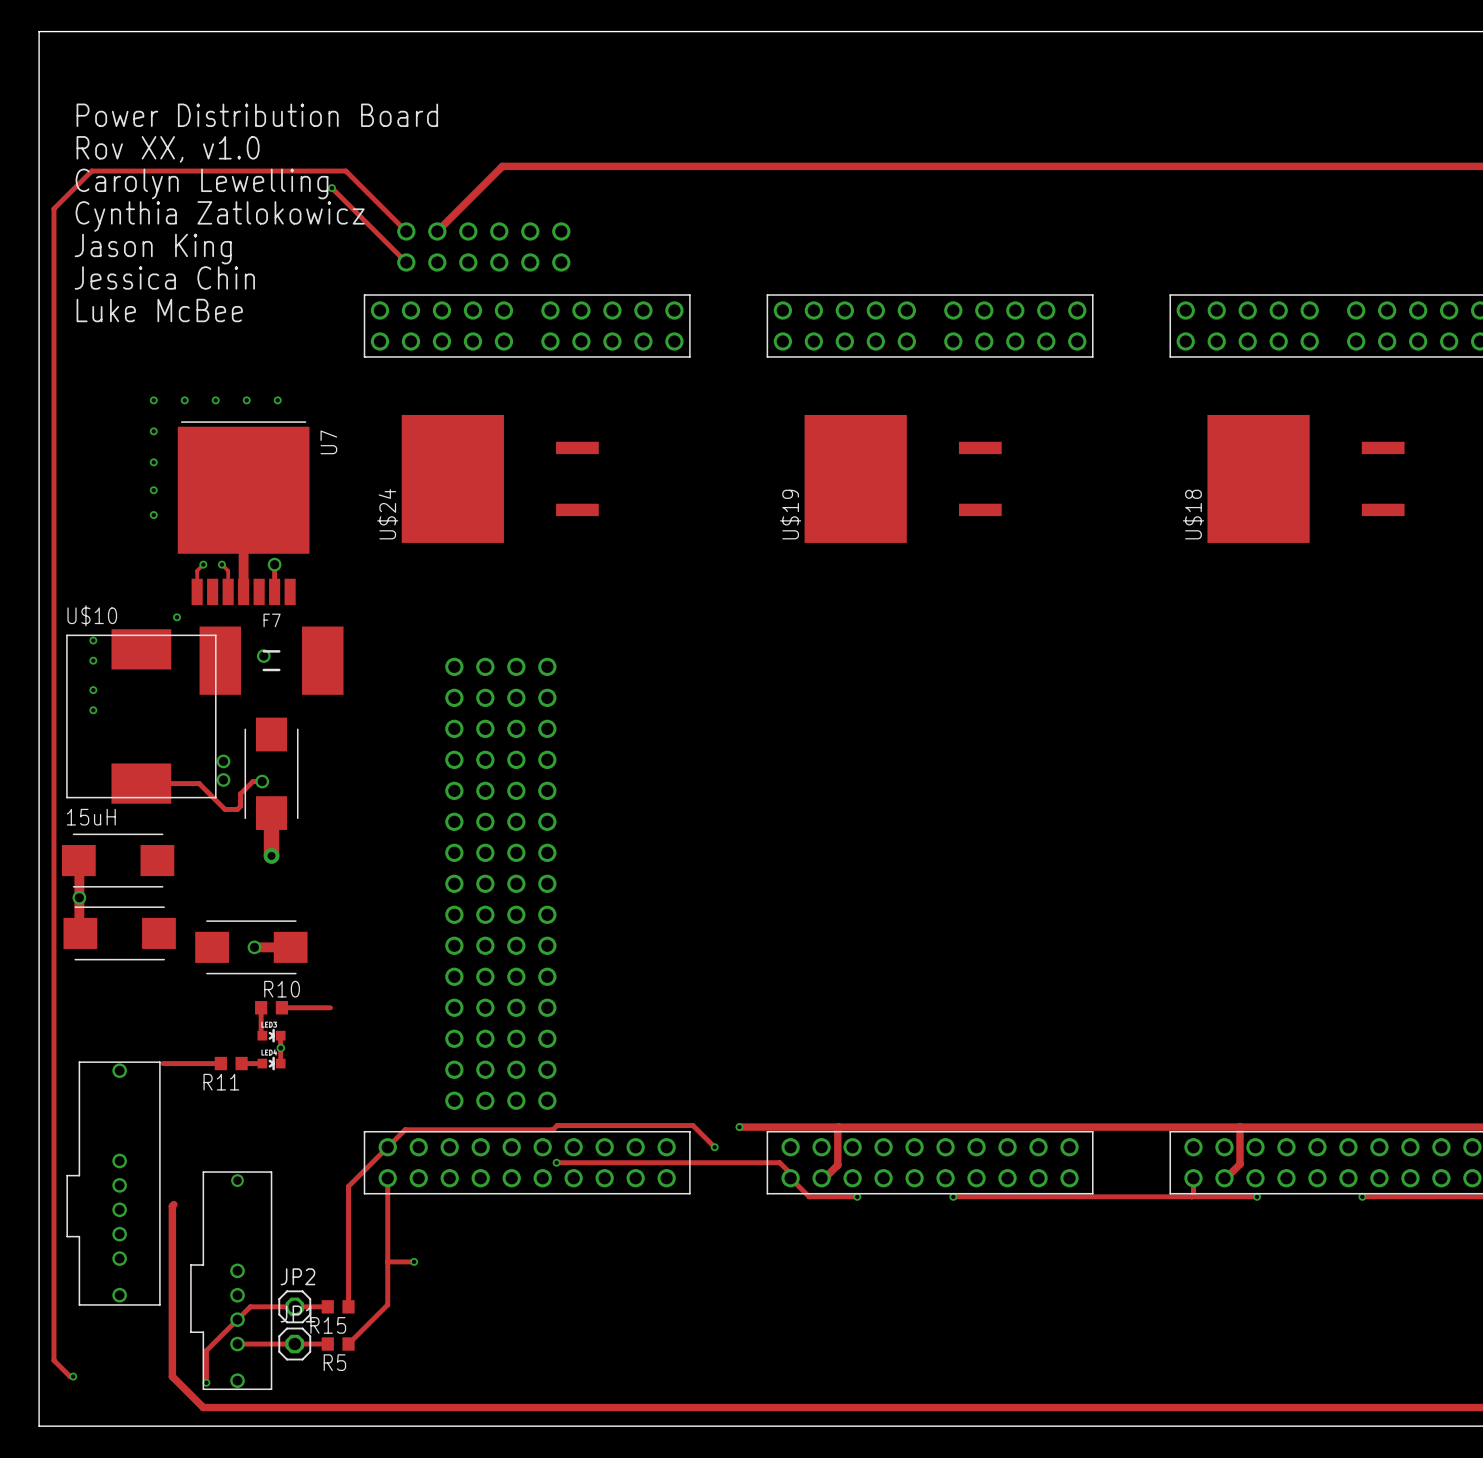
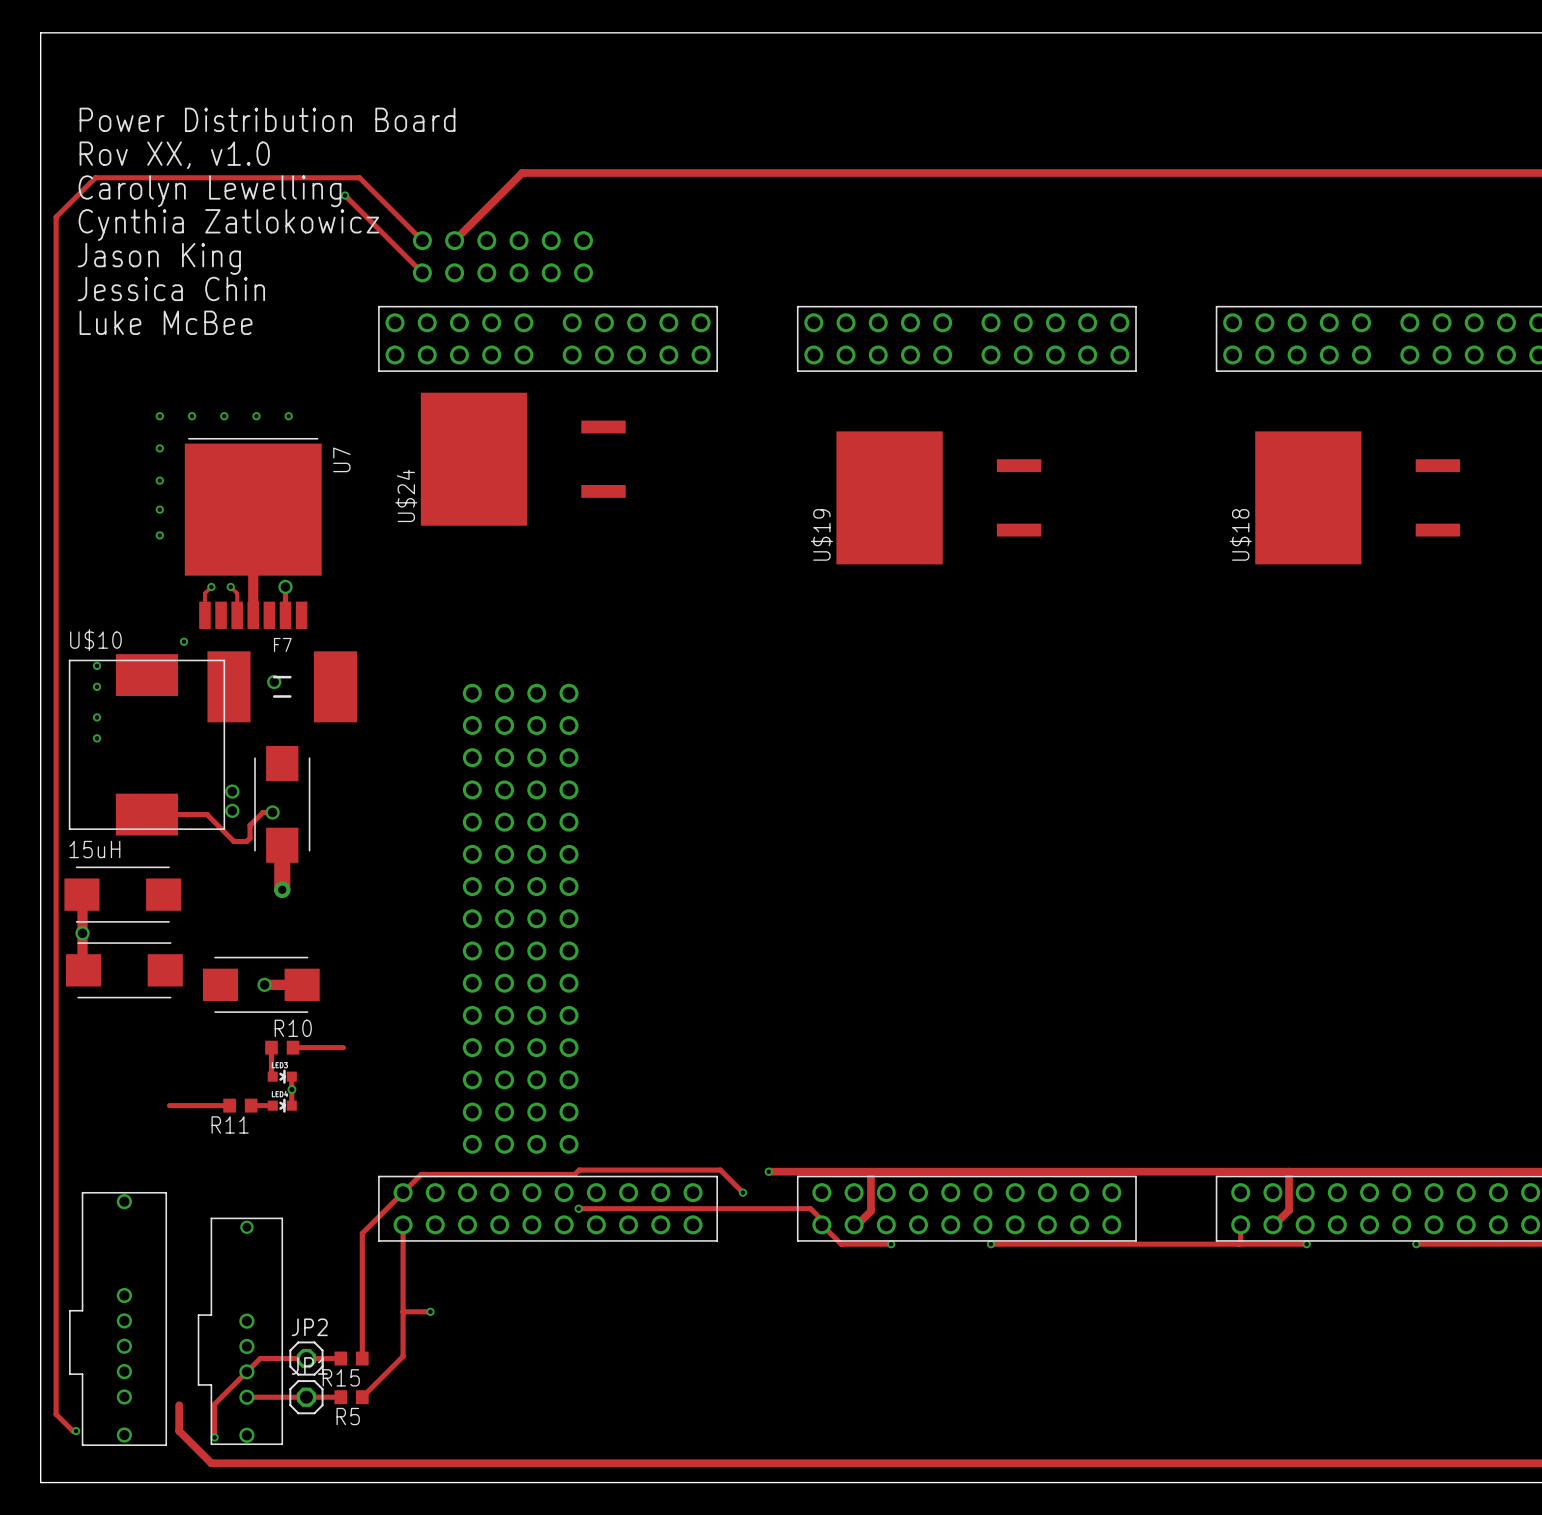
U$24 position: (500, 478) -> (523, 459)
part position: (113, 1183) -> (118, 1318)
track: (173, 1204) (172, 1206) (172, 1351) -> none

